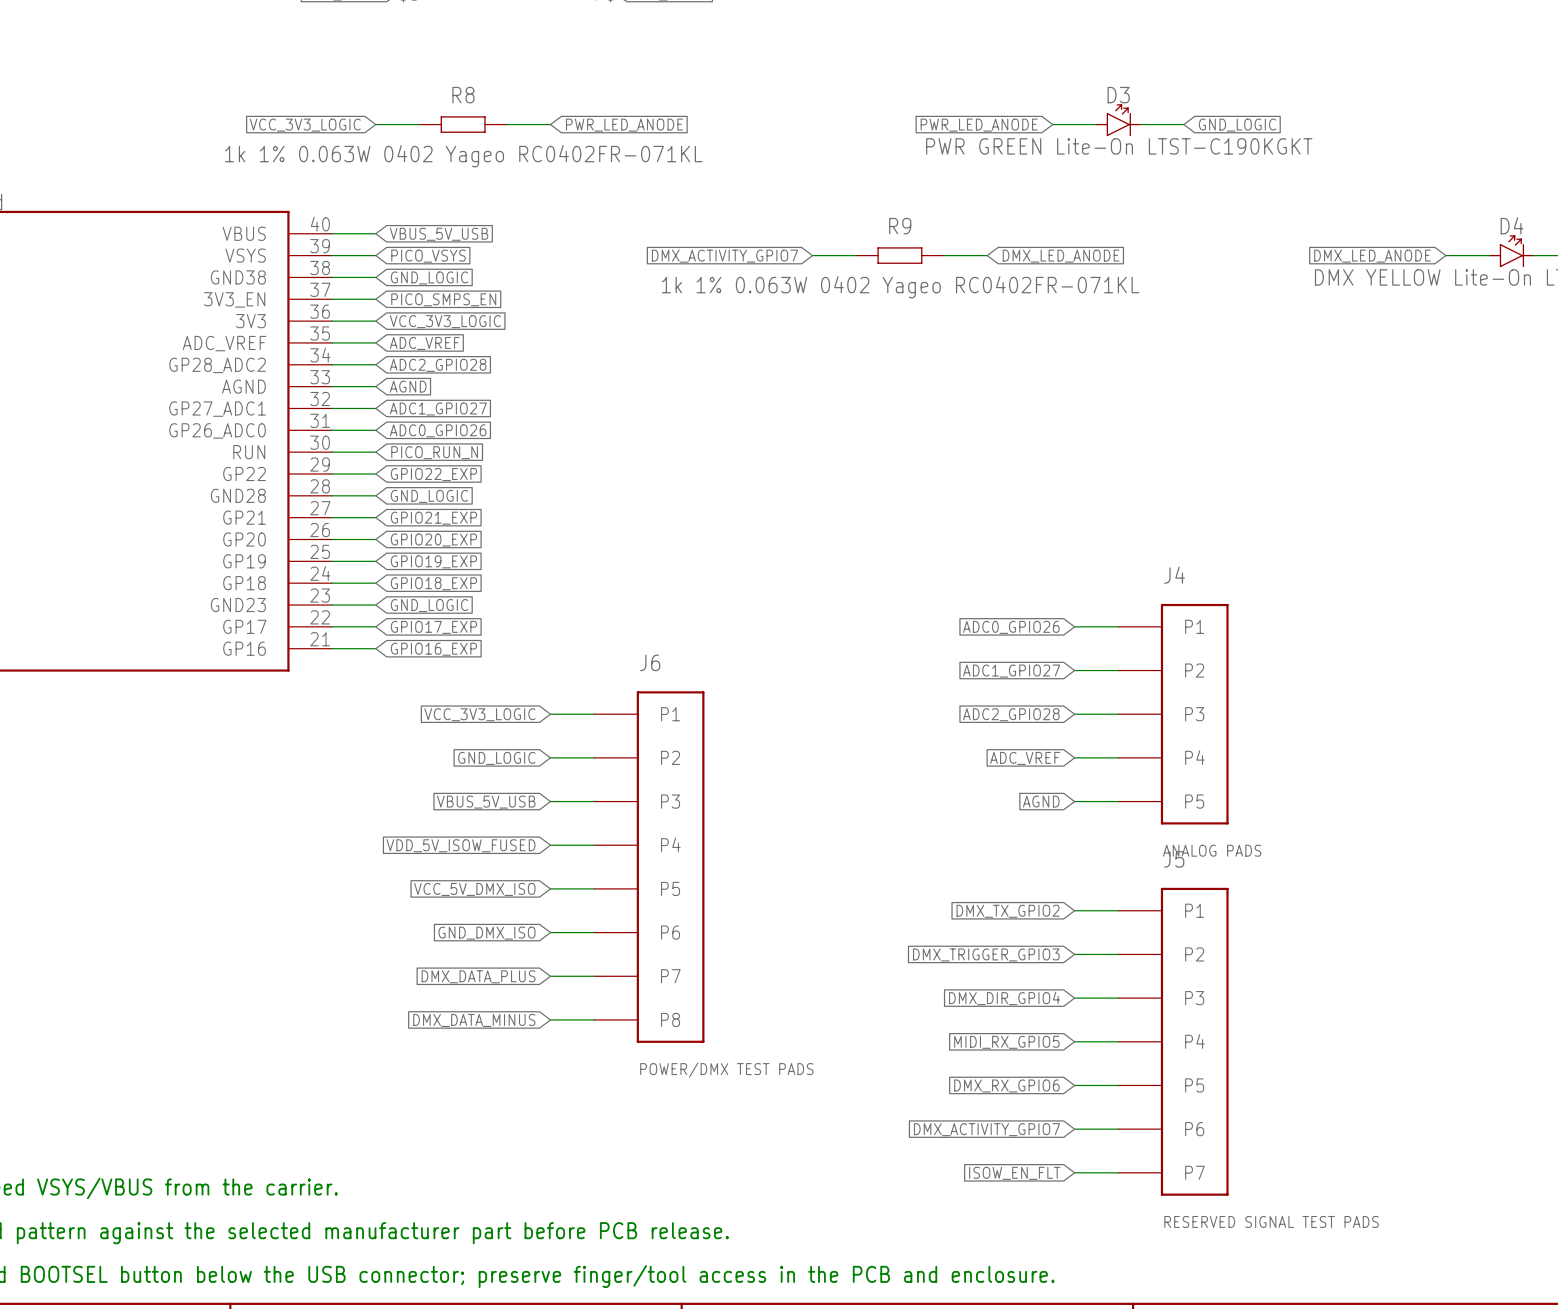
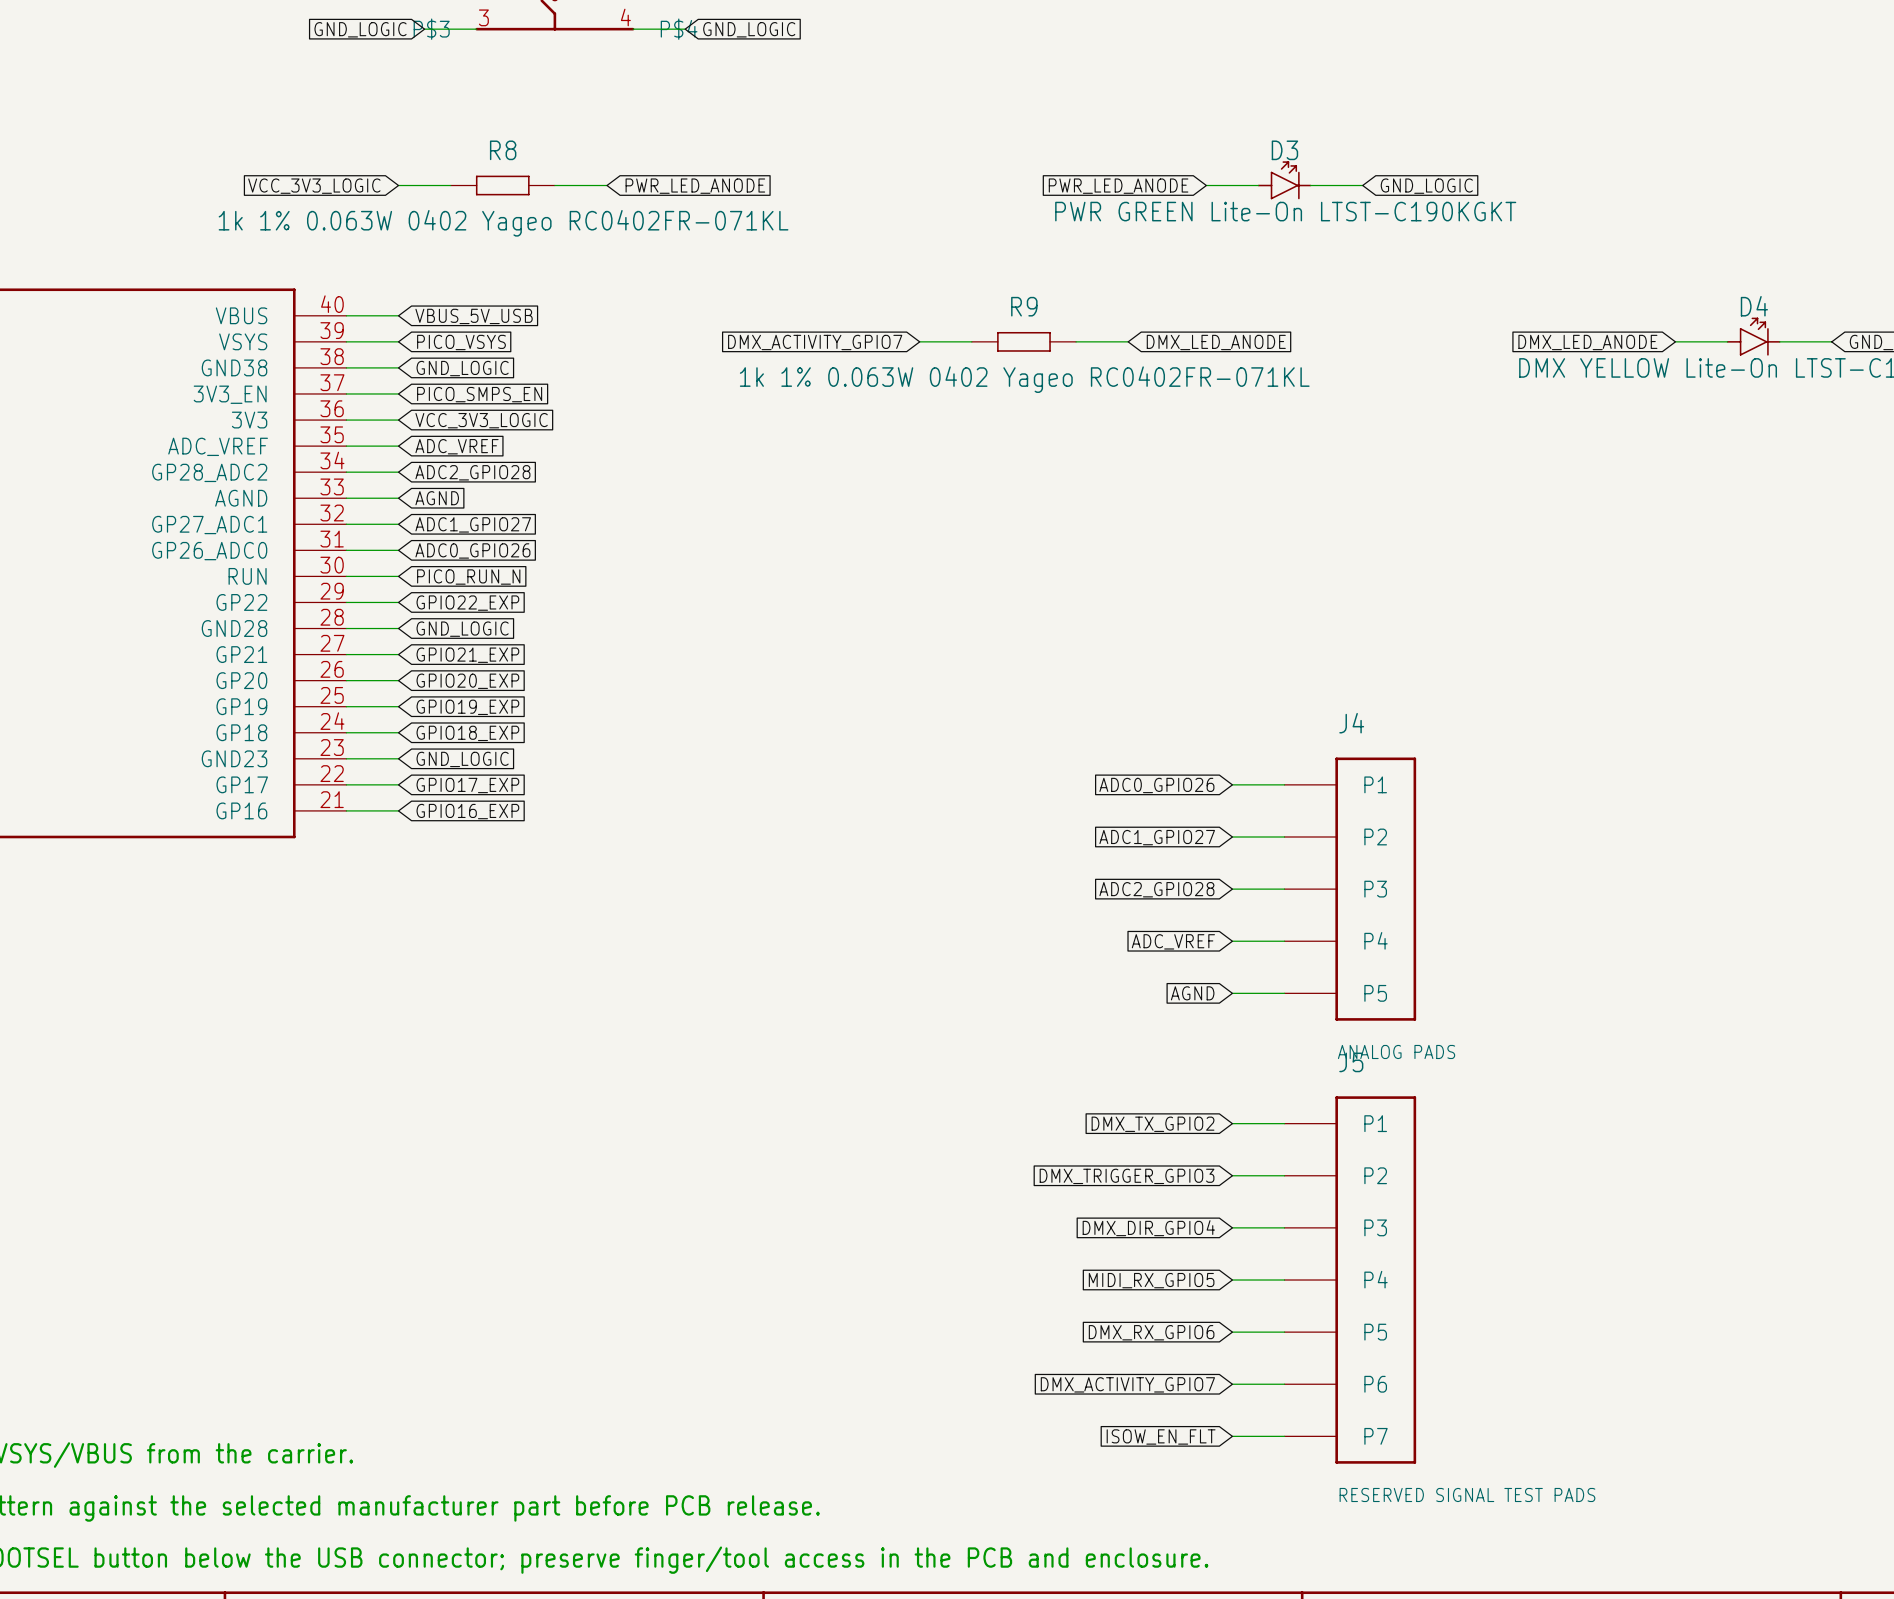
global label: VCC_3V3_LOGIC (479, 714) -> none
wire: (550, 714) (594, 714) -> none
wire: (550, 757) (594, 757) -> none
global label: GND_LOGIC (496, 758) -> none
wire: (550, 801) (594, 801) -> none
global label: VBUS_5V_USB (486, 802) -> none
global label: VDD_5V_ISOW_FUSED (461, 845) -> none
wire: (550, 845) (594, 845) -> none
J6: POWER/DMX TEST PADS (649, 867) -> none
wire: (550, 888) (594, 888) -> none
global label: VCC_5V_DMX_ISO (474, 889) -> none
wire: (550, 932) (594, 932) -> none
global label: GND_DMX_ISO (486, 933) -> none
global label: DMX_DATA_PLUS (478, 976) -> none
wire: (550, 976) (594, 976) -> none
wire: (550, 1019) (594, 1019) -> none
global label: DMX_DATA_MINUS (474, 1020) -> none

